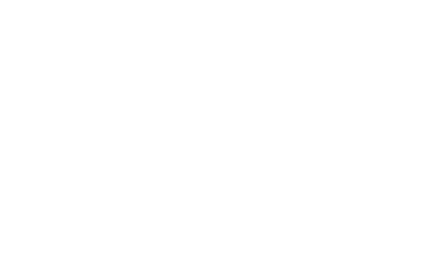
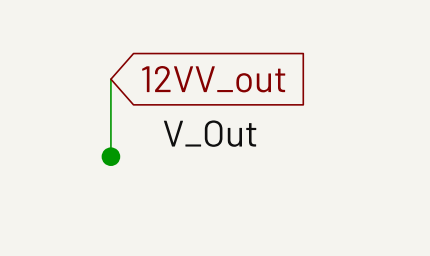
wire: none -> (110, 79) (110, 156)
global label: none -> 12VV_out (213, 79)
label: none -> V_Out (210, 133)
junction: none -> (110, 156)

